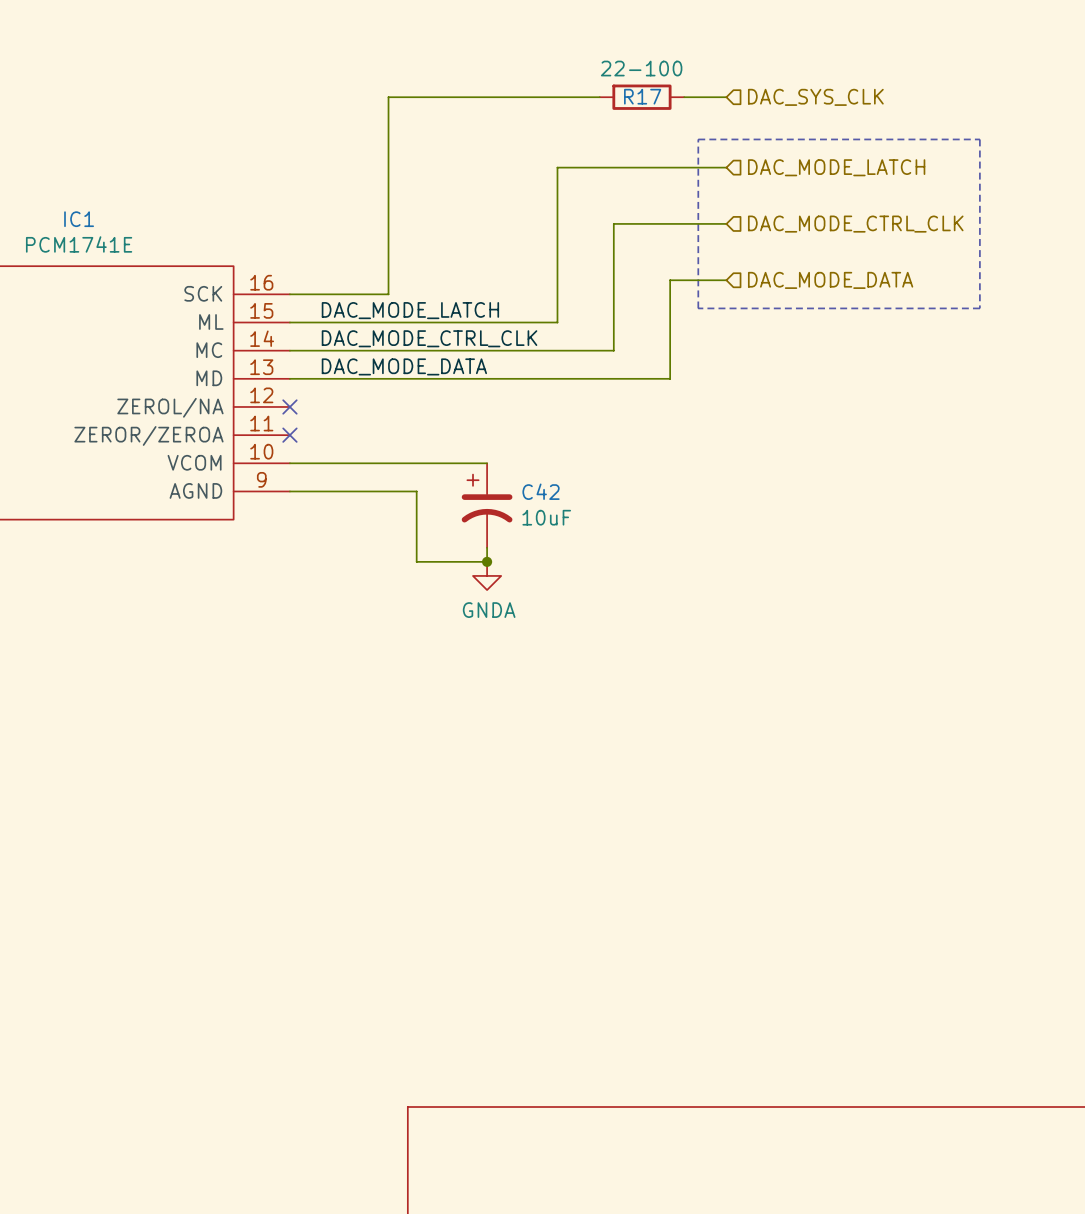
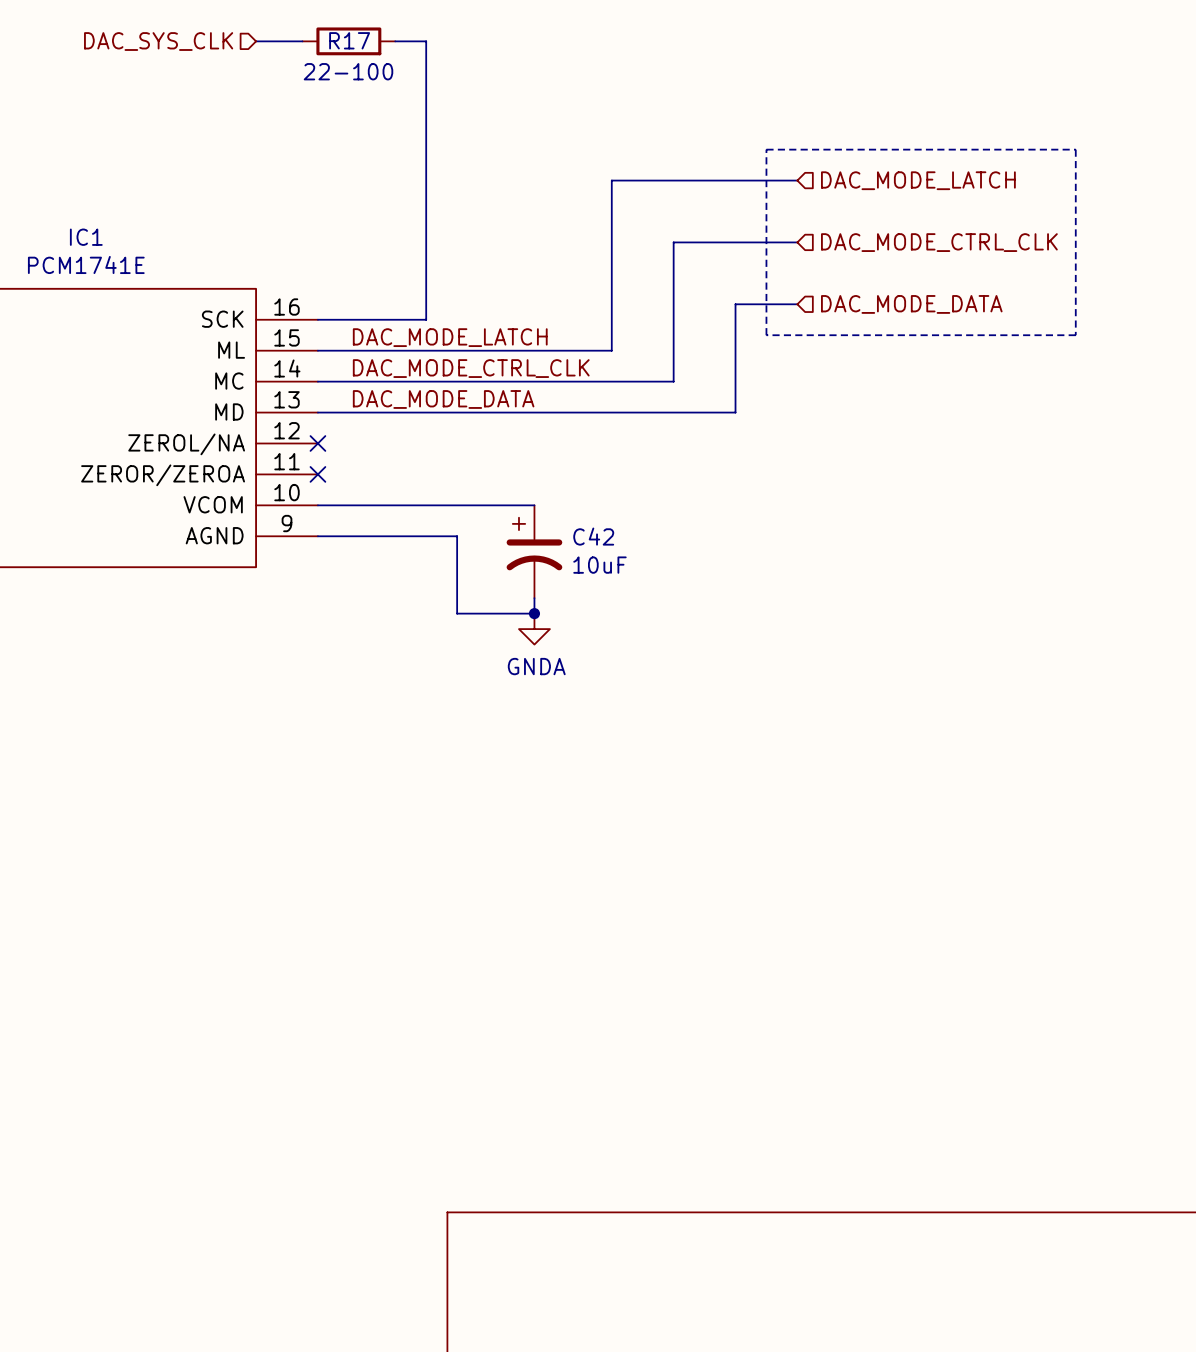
wire: none -> (256, 41) (302, 41)
hierarchical label: none -> DAC_SYS_CLK (158, 41)
R17 value position: 22-100 (641, 68) -> 22-100 (348, 71)
wire: (388, 97) (599, 97) -> (426, 103) (426, 41) (395, 41)
R17 position: (641, 97) -> (348, 41)
wire: (684, 97) (726, 97) -> none
hierarchical label: DAC_SYS_CLK (815, 97) -> none

